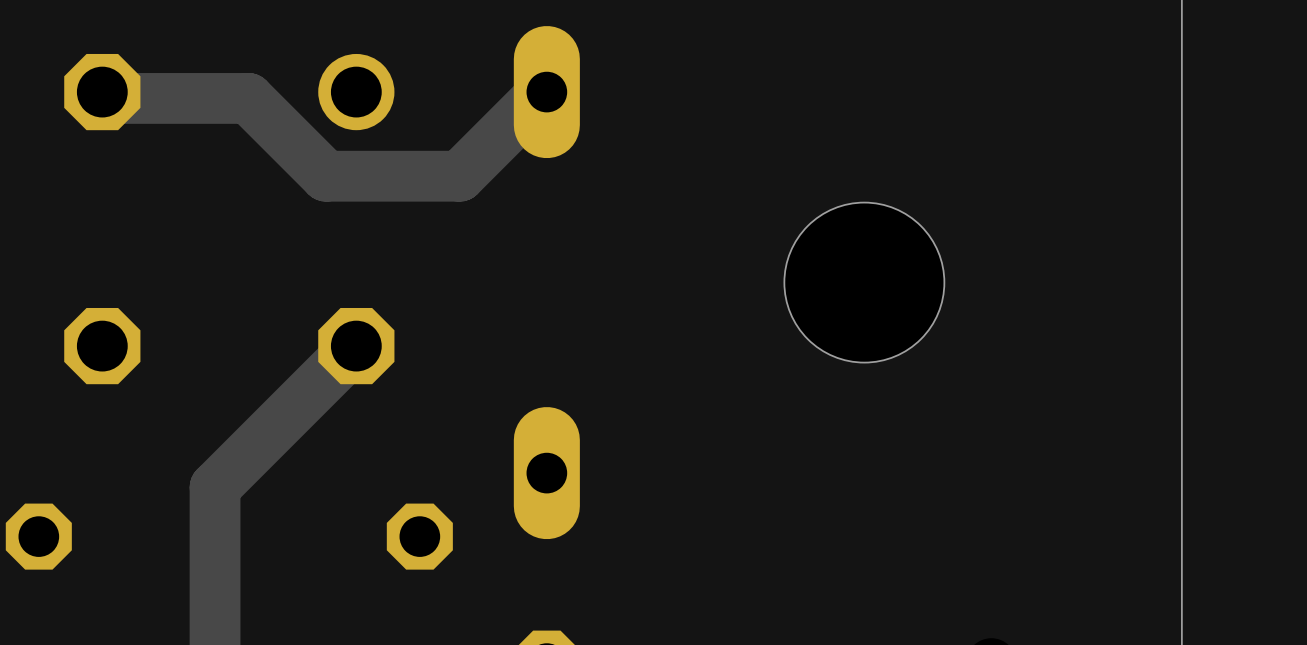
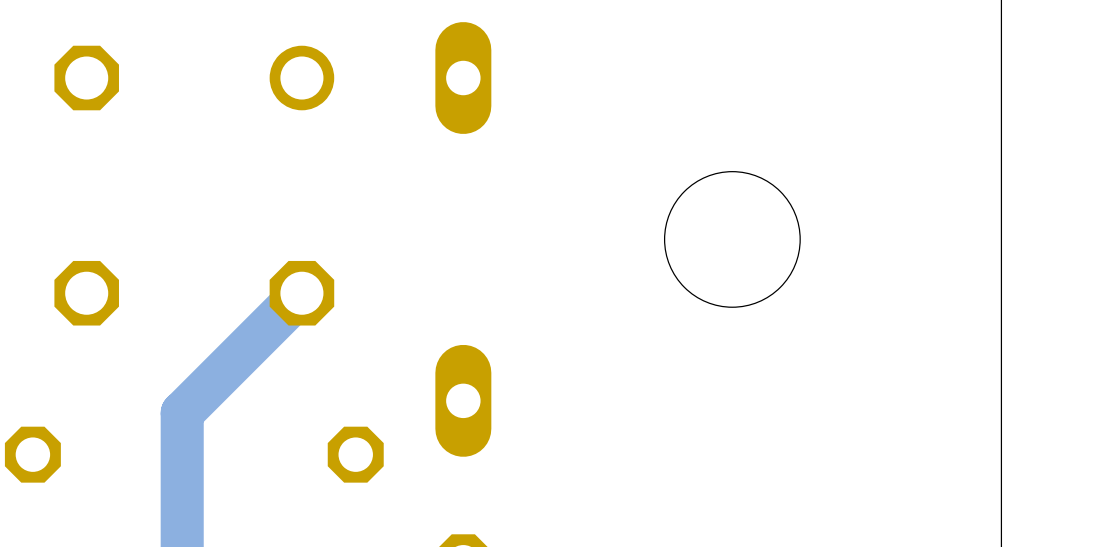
track: (546, 92) (537, 98) (459, 176) (326, 176) (248, 98) (103, 98) (102, 92) -> none

